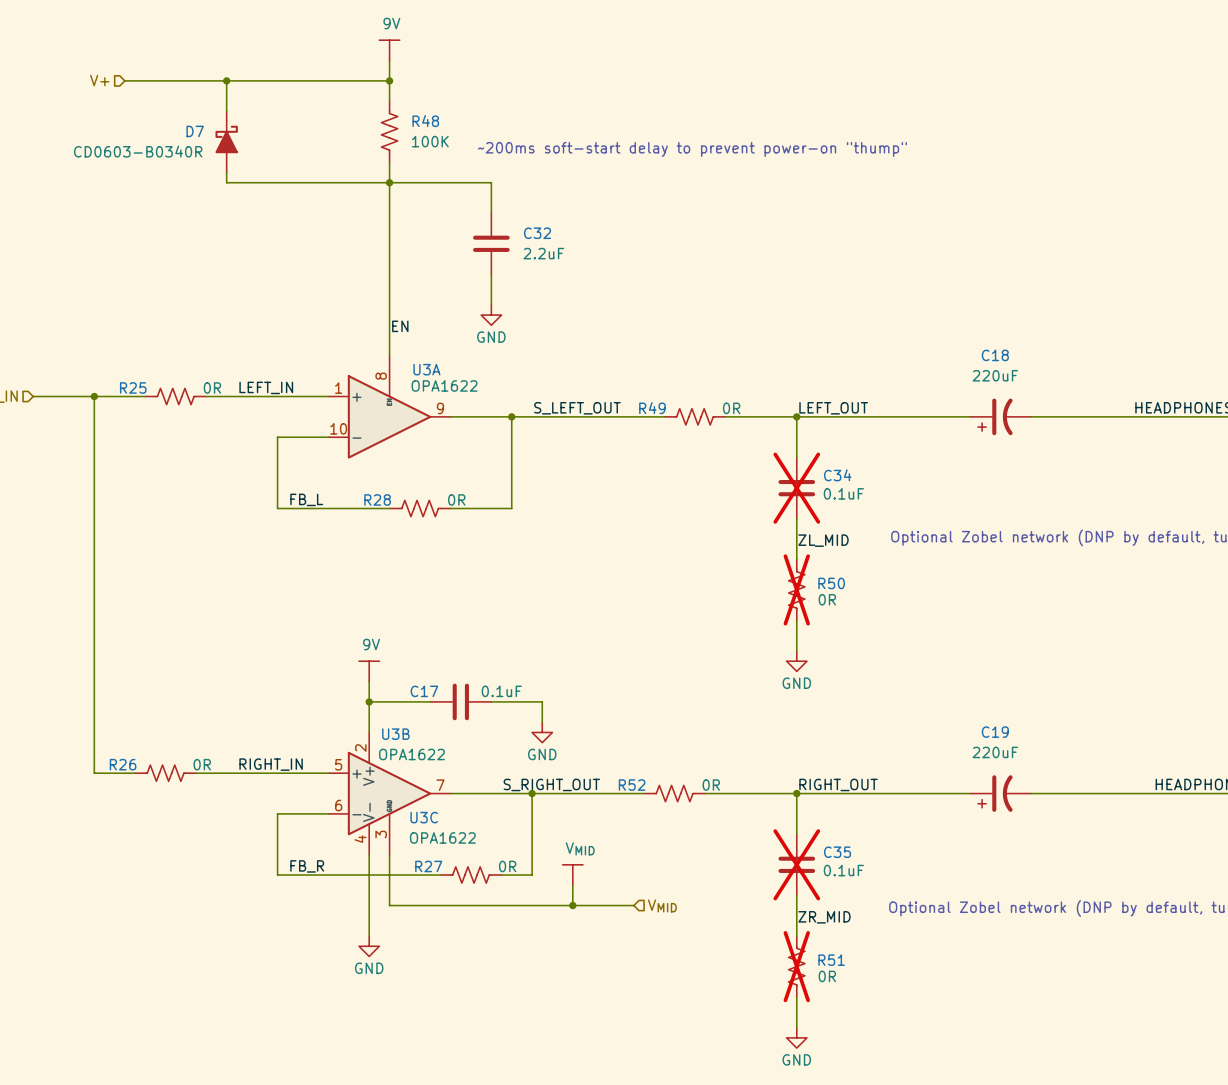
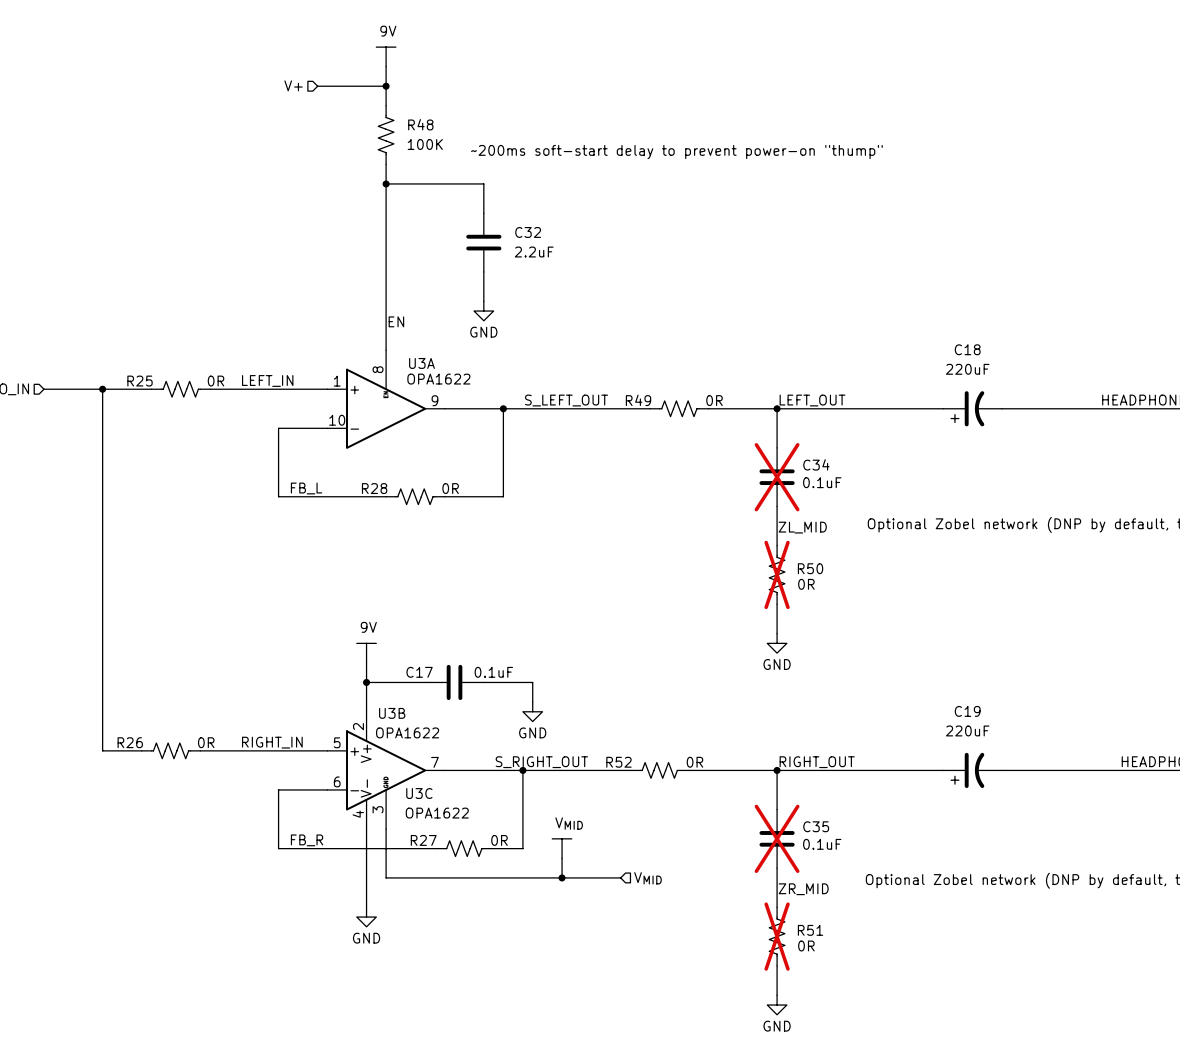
hierarchical label position: V+ (99, 80) -> V+ (293, 85)
wire: (124, 80) (318, 80) -> none
wire: (226, 80) (226, 111) -> none
junction: (226, 80) -> none
D7: CD0603-B0340R (226, 142) -> none
wire: (226, 172) (226, 182) (389, 182) -> none

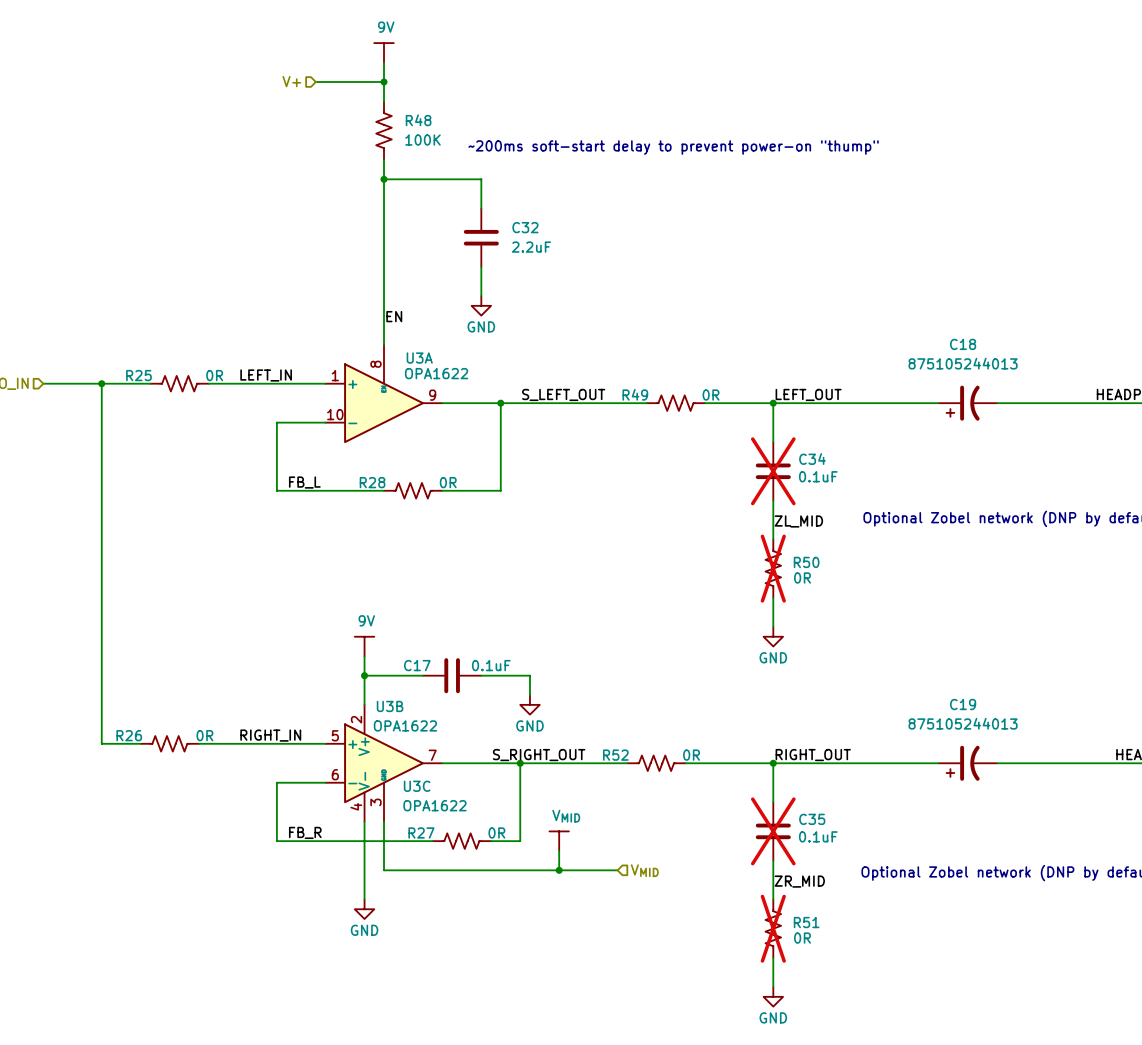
C18 value: 220uF (967, 369) -> 875105244013 (963, 363)
C19 value: 220uF (967, 730) -> 875105244013 (963, 723)

